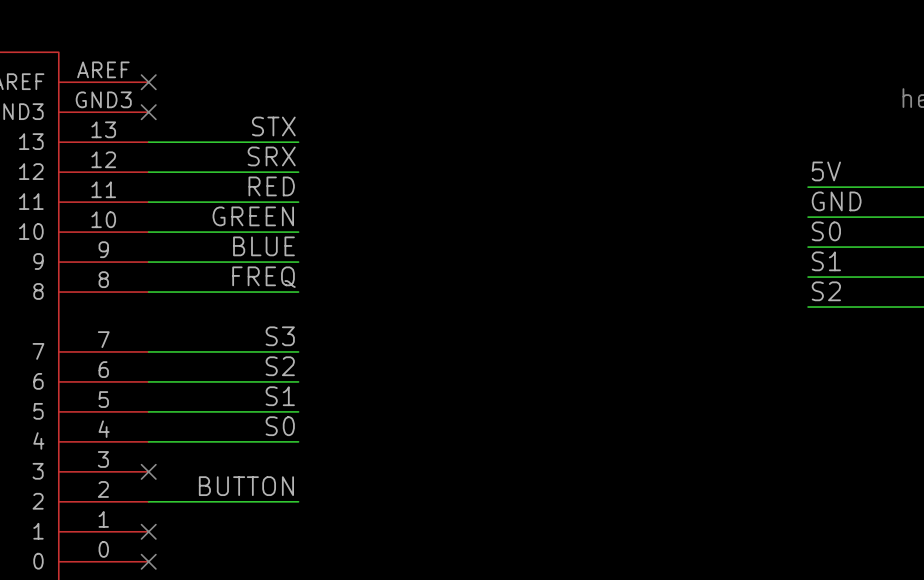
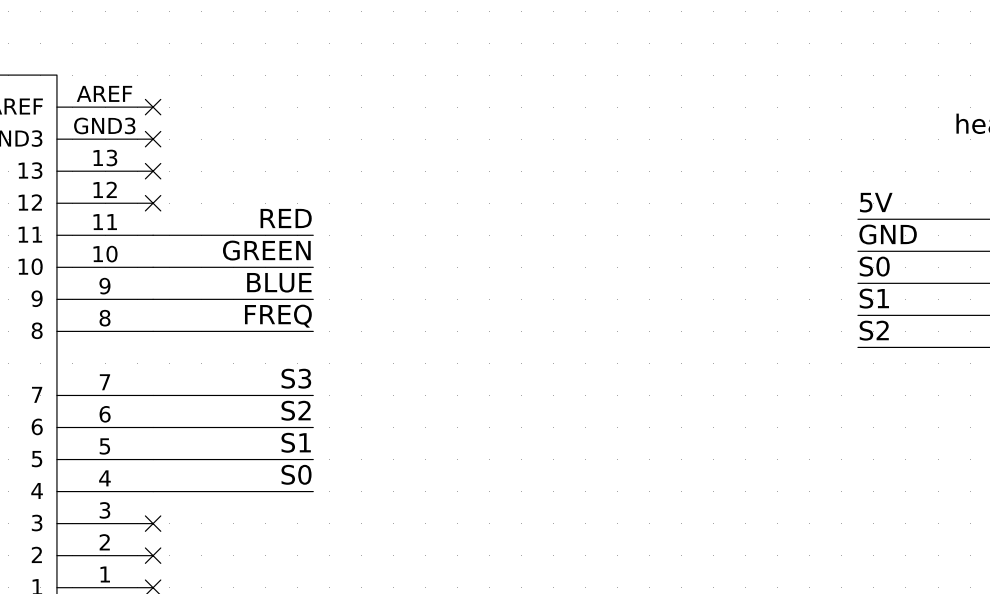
label: STX (273, 126) -> none
wire: (148, 142) (298, 142) -> none
no-connect mark: none -> (153, 171)
label: SRX (271, 156) -> none
wire: (148, 172) (298, 172) -> none
no-connect mark: none -> (153, 203)
label: BUTTON (246, 486) -> none
wire: (148, 501) (298, 501) -> none
no-connect mark: none -> (153, 555)

